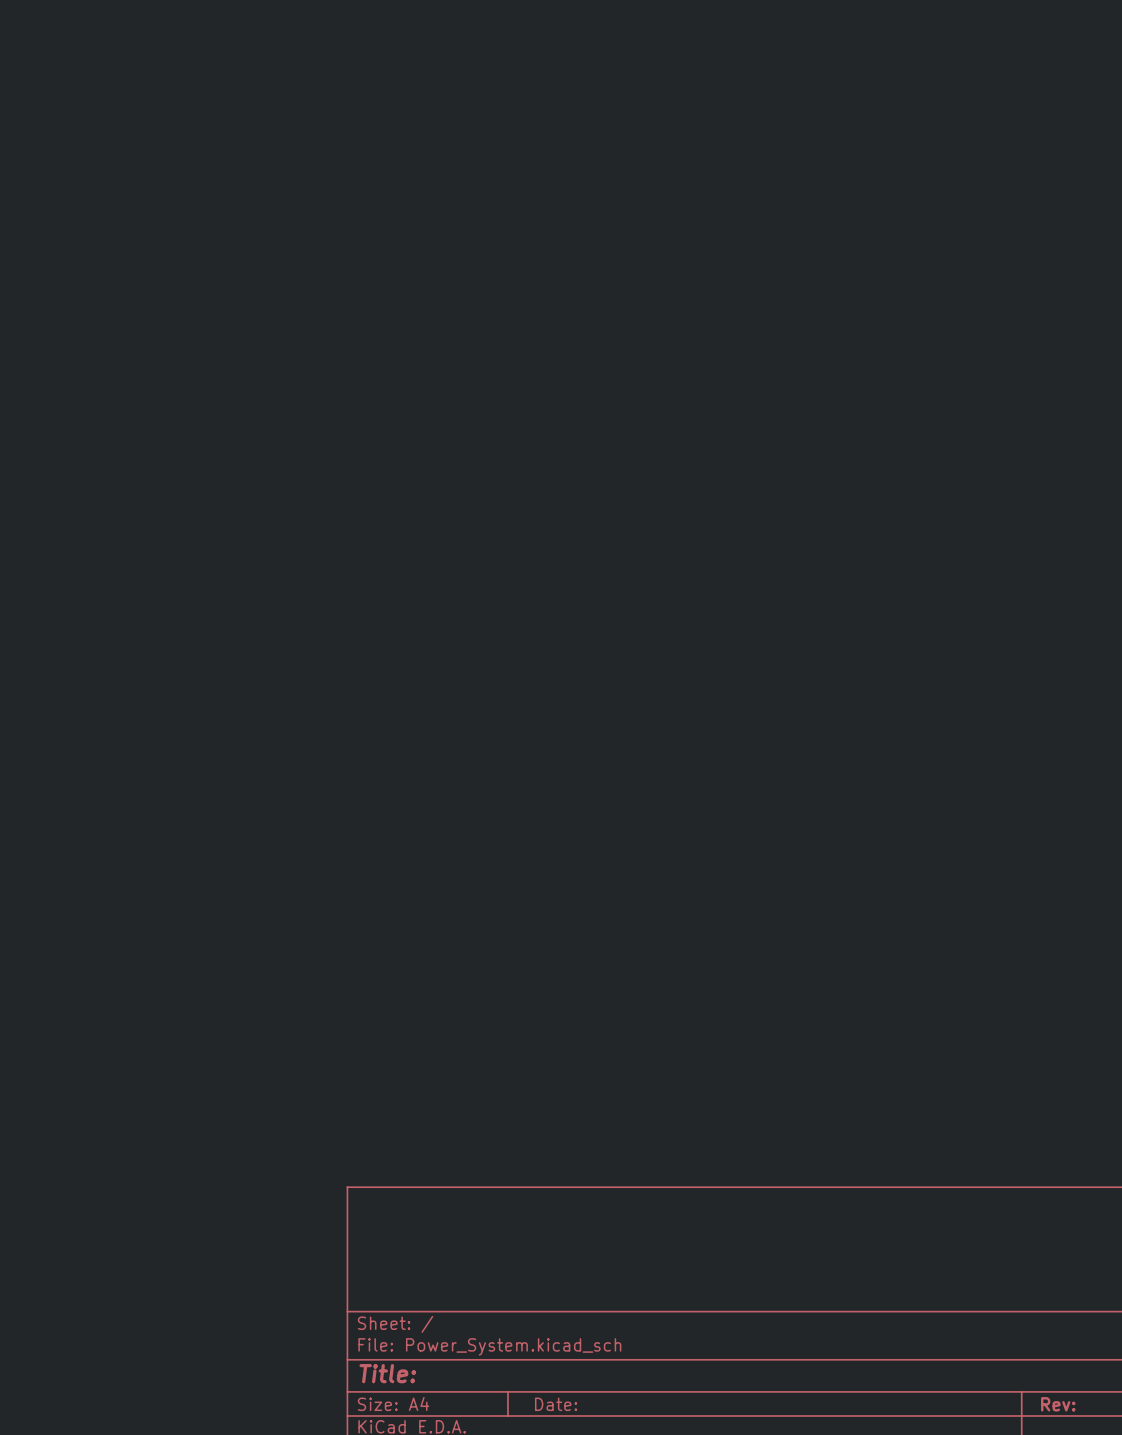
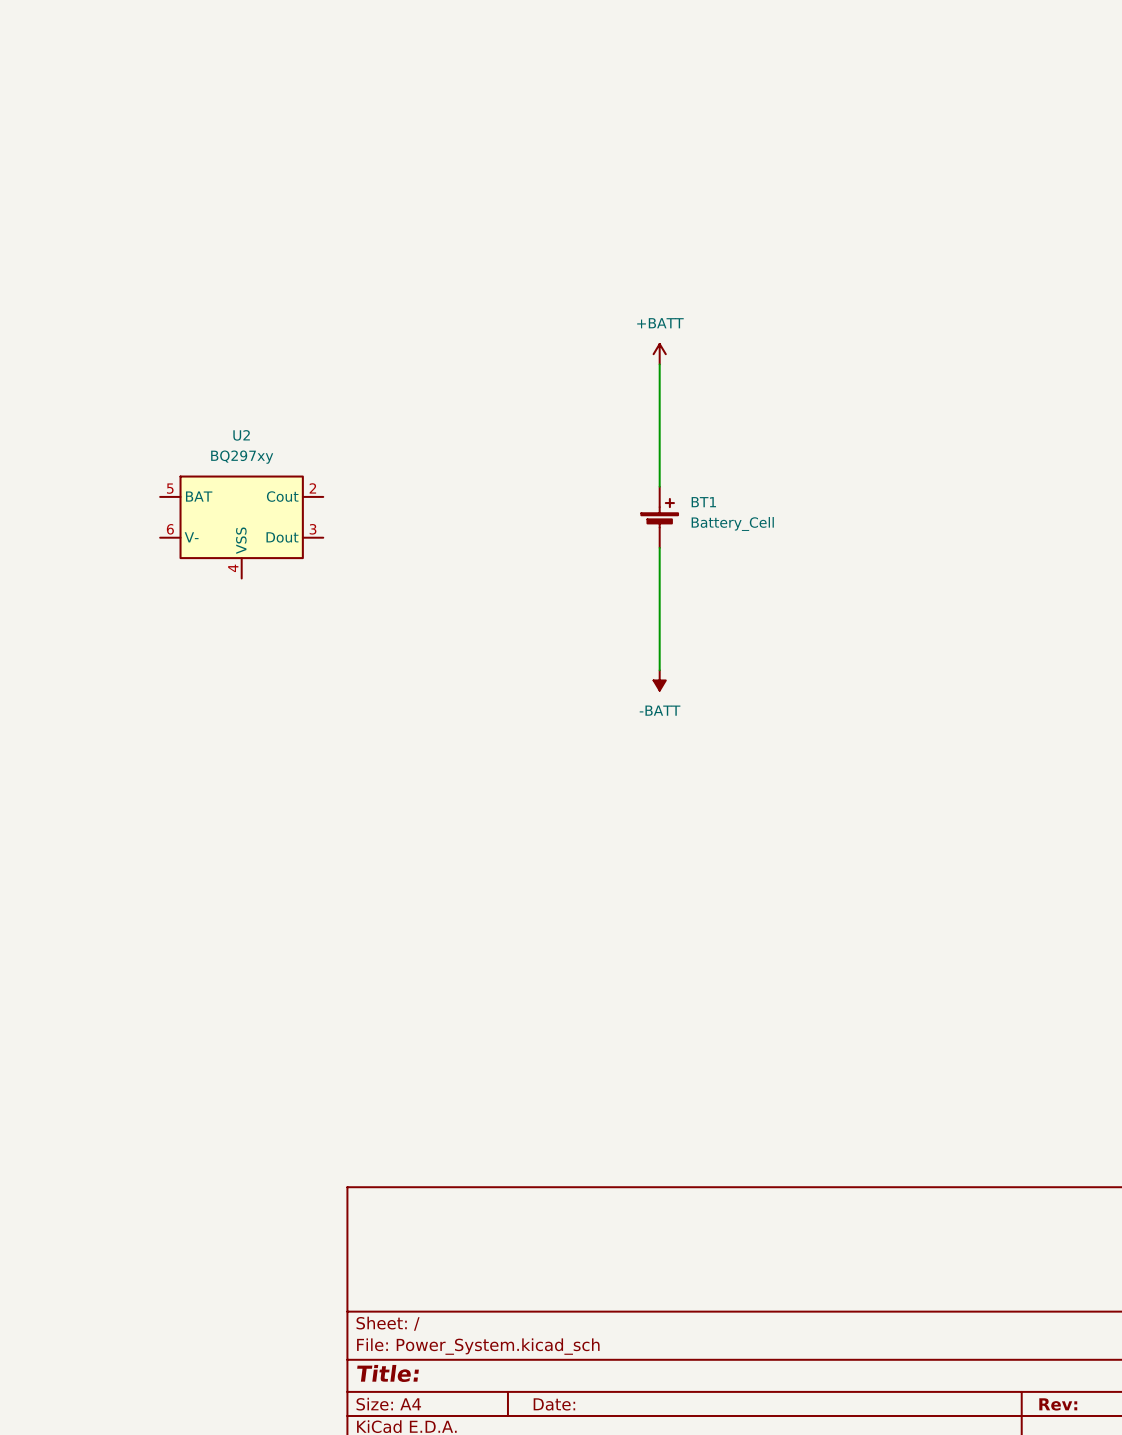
power symbol: none -> +BATT (659, 354)
wire: none -> (659, 364) (659, 486)
BT1: none -> Battery_Cell (659, 517)
U2: none -> BQ297xy (241, 527)
wire: none -> (659, 547) (659, 670)
power symbol: none -> -BATT (659, 680)

